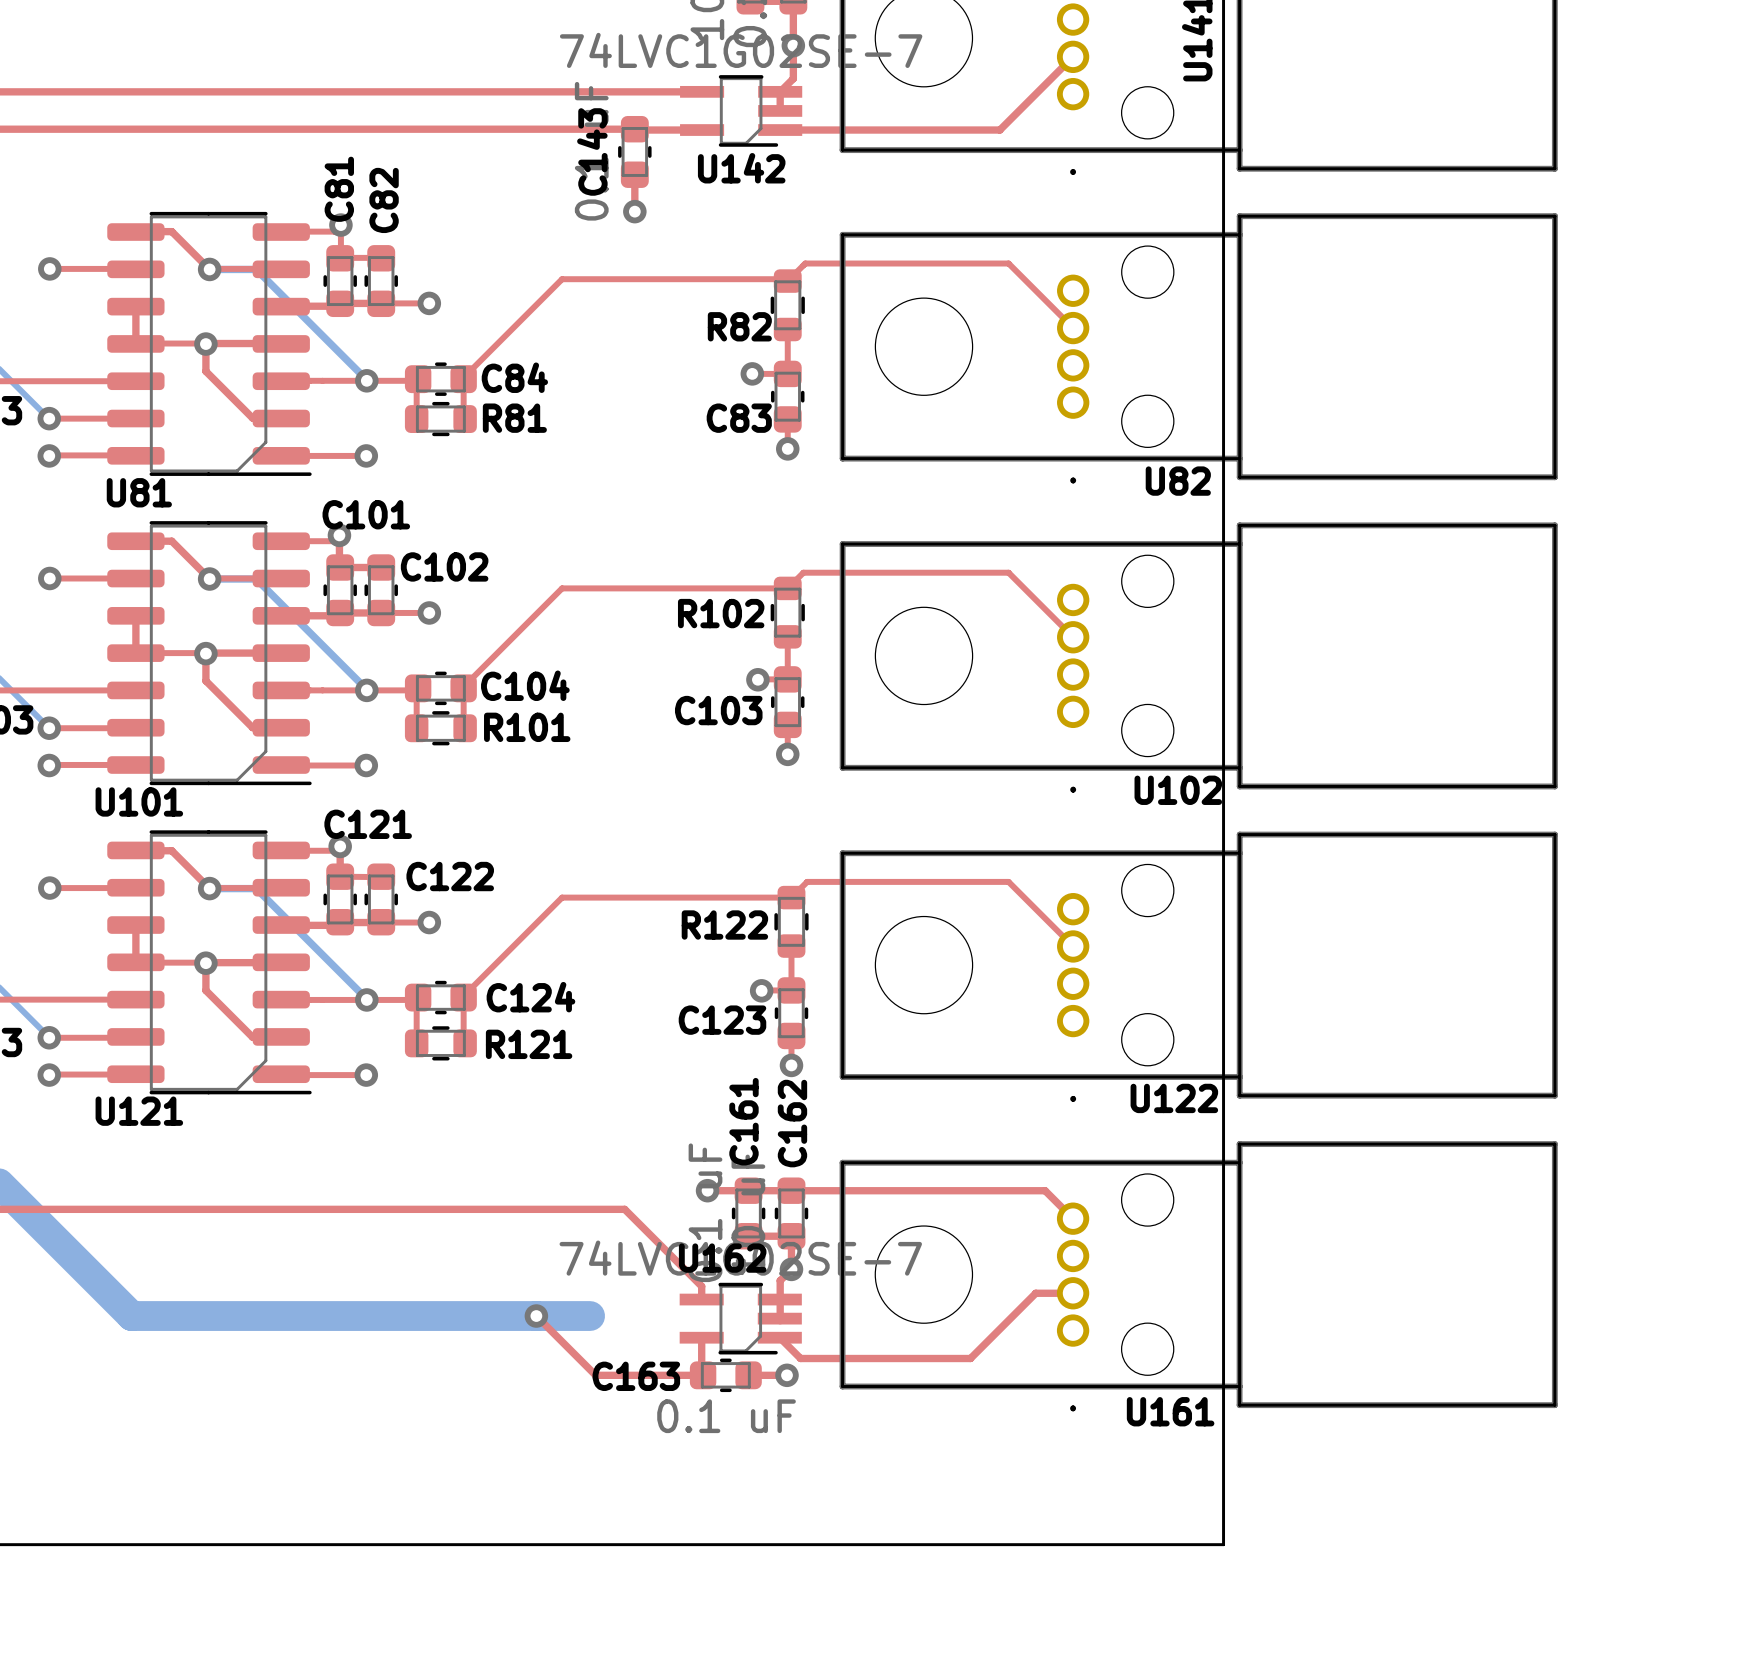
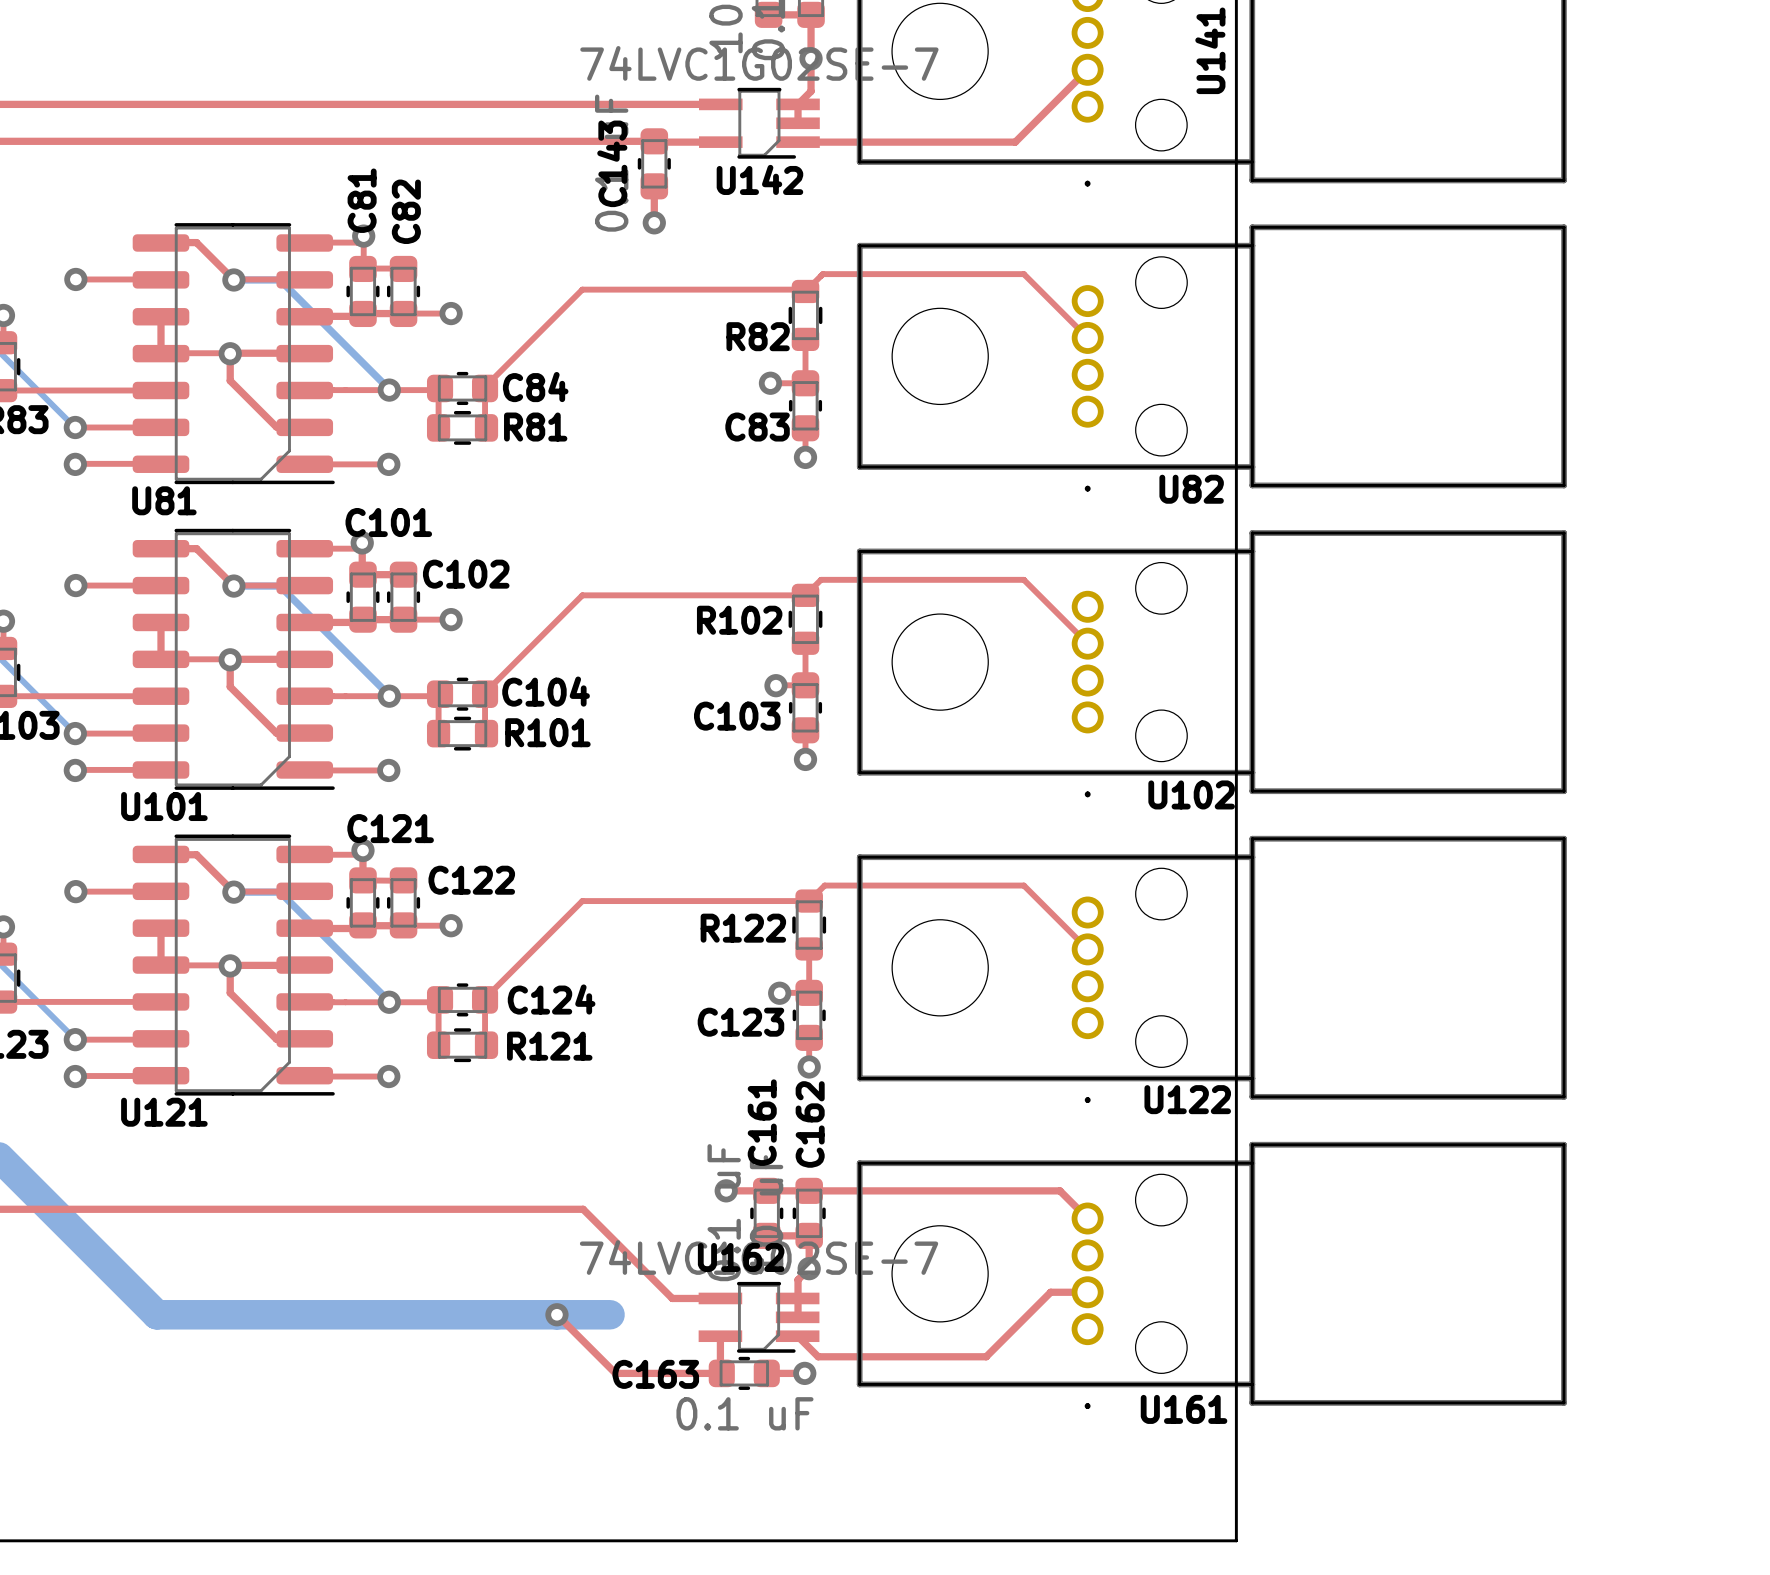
top track: (562, 1209) (624, 1209) (701, 1286) (701, 1299) -> (583, 1209) (672, 1298) (720, 1298)

